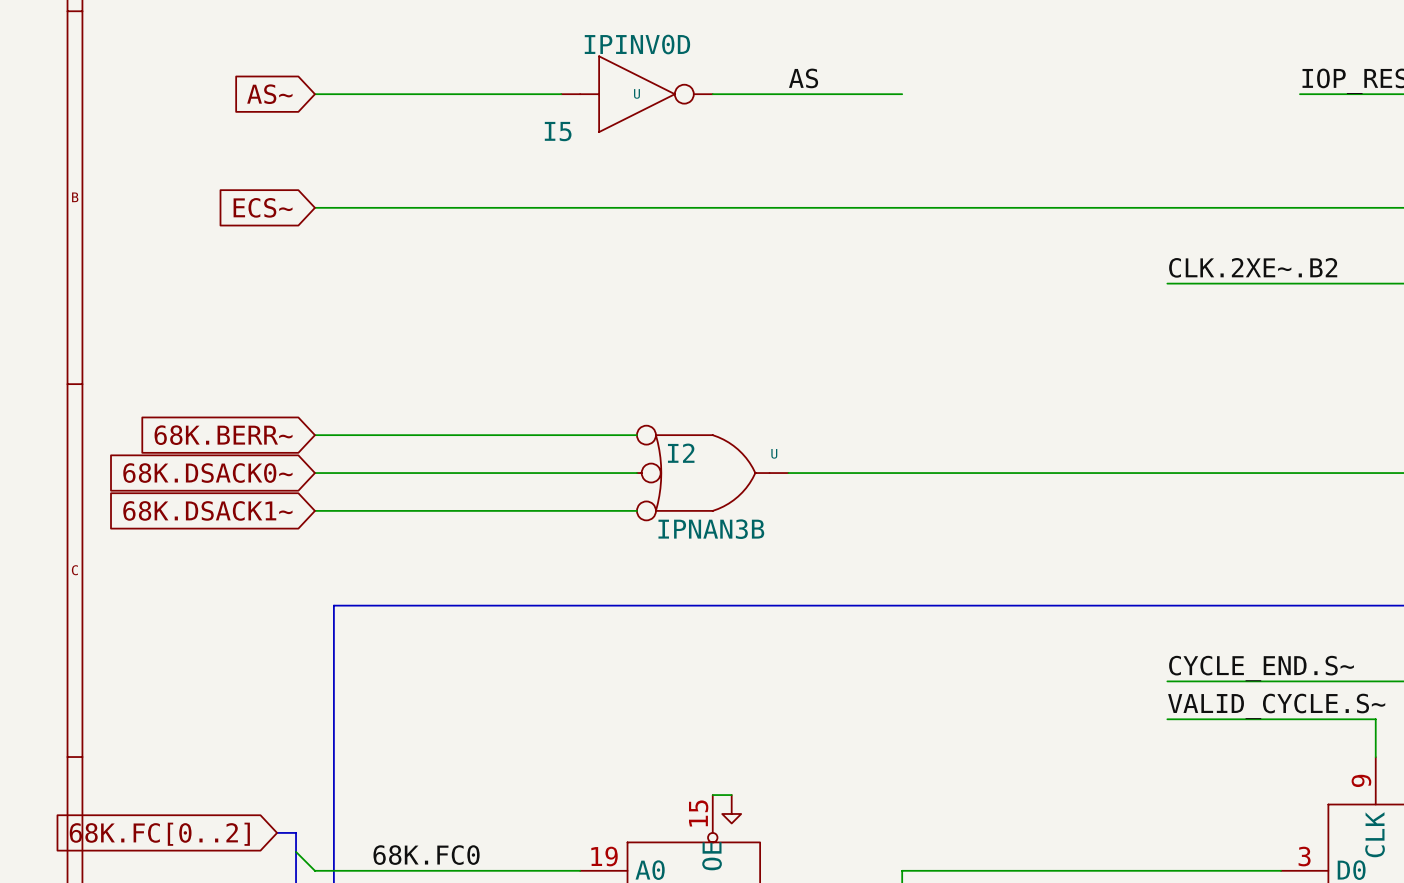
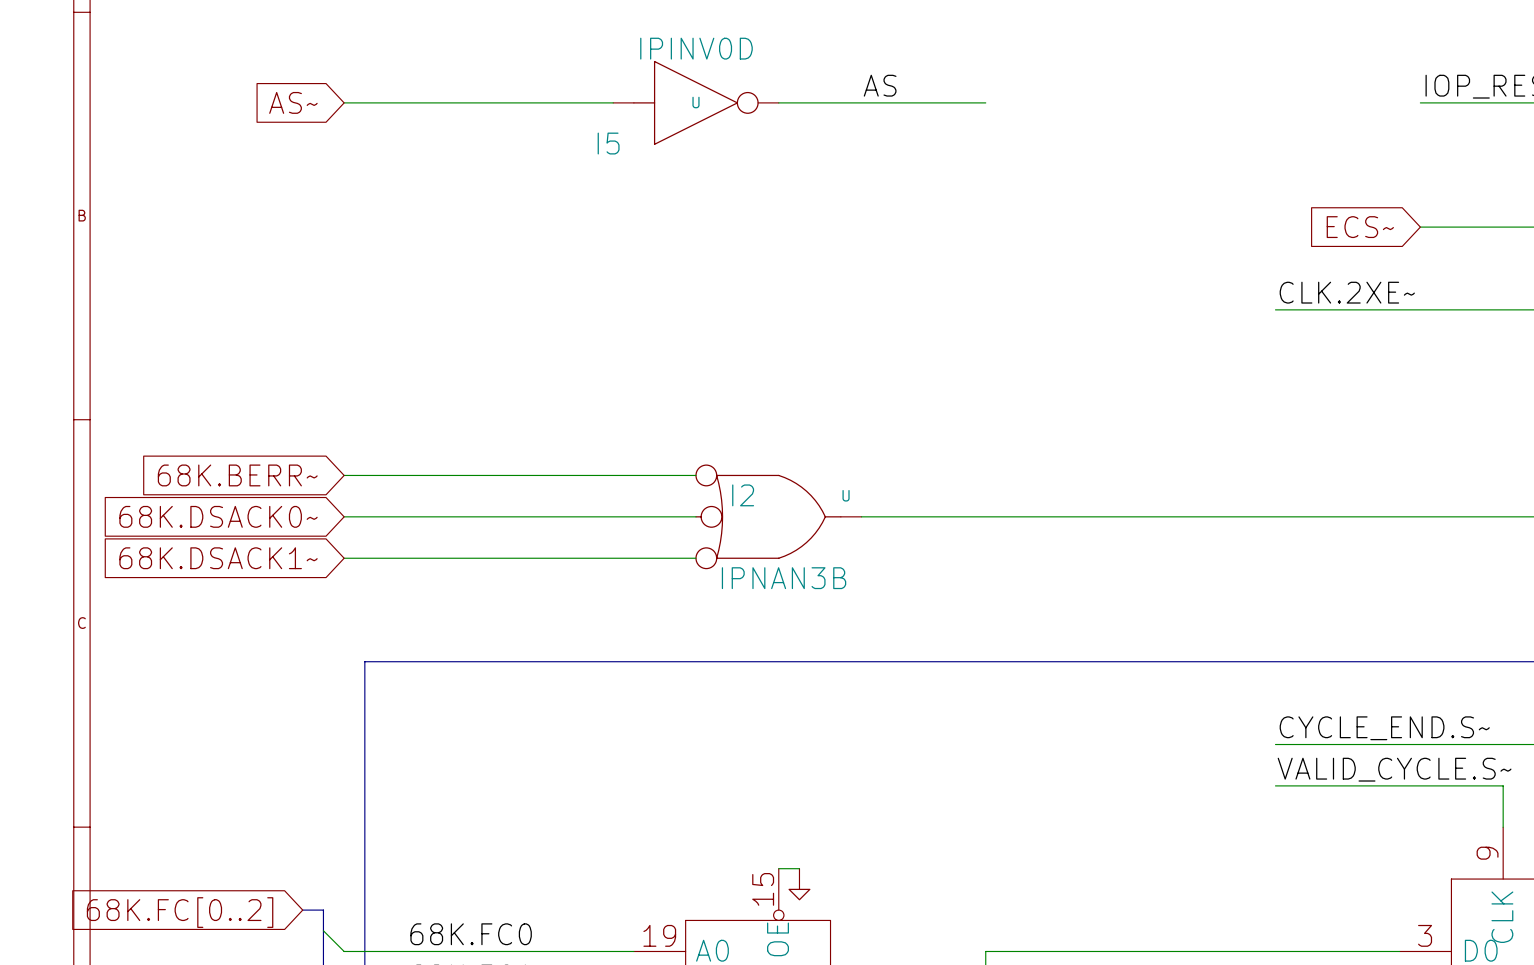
global label: ECS~ (263, 207) -> none
wire: (314, 207) (1299, 207) -> none
global label: none -> ECS~ (1360, 227)
label: CLK.2XE~.B2 (1253, 267) -> CLK.2XE~ (1347, 292)

